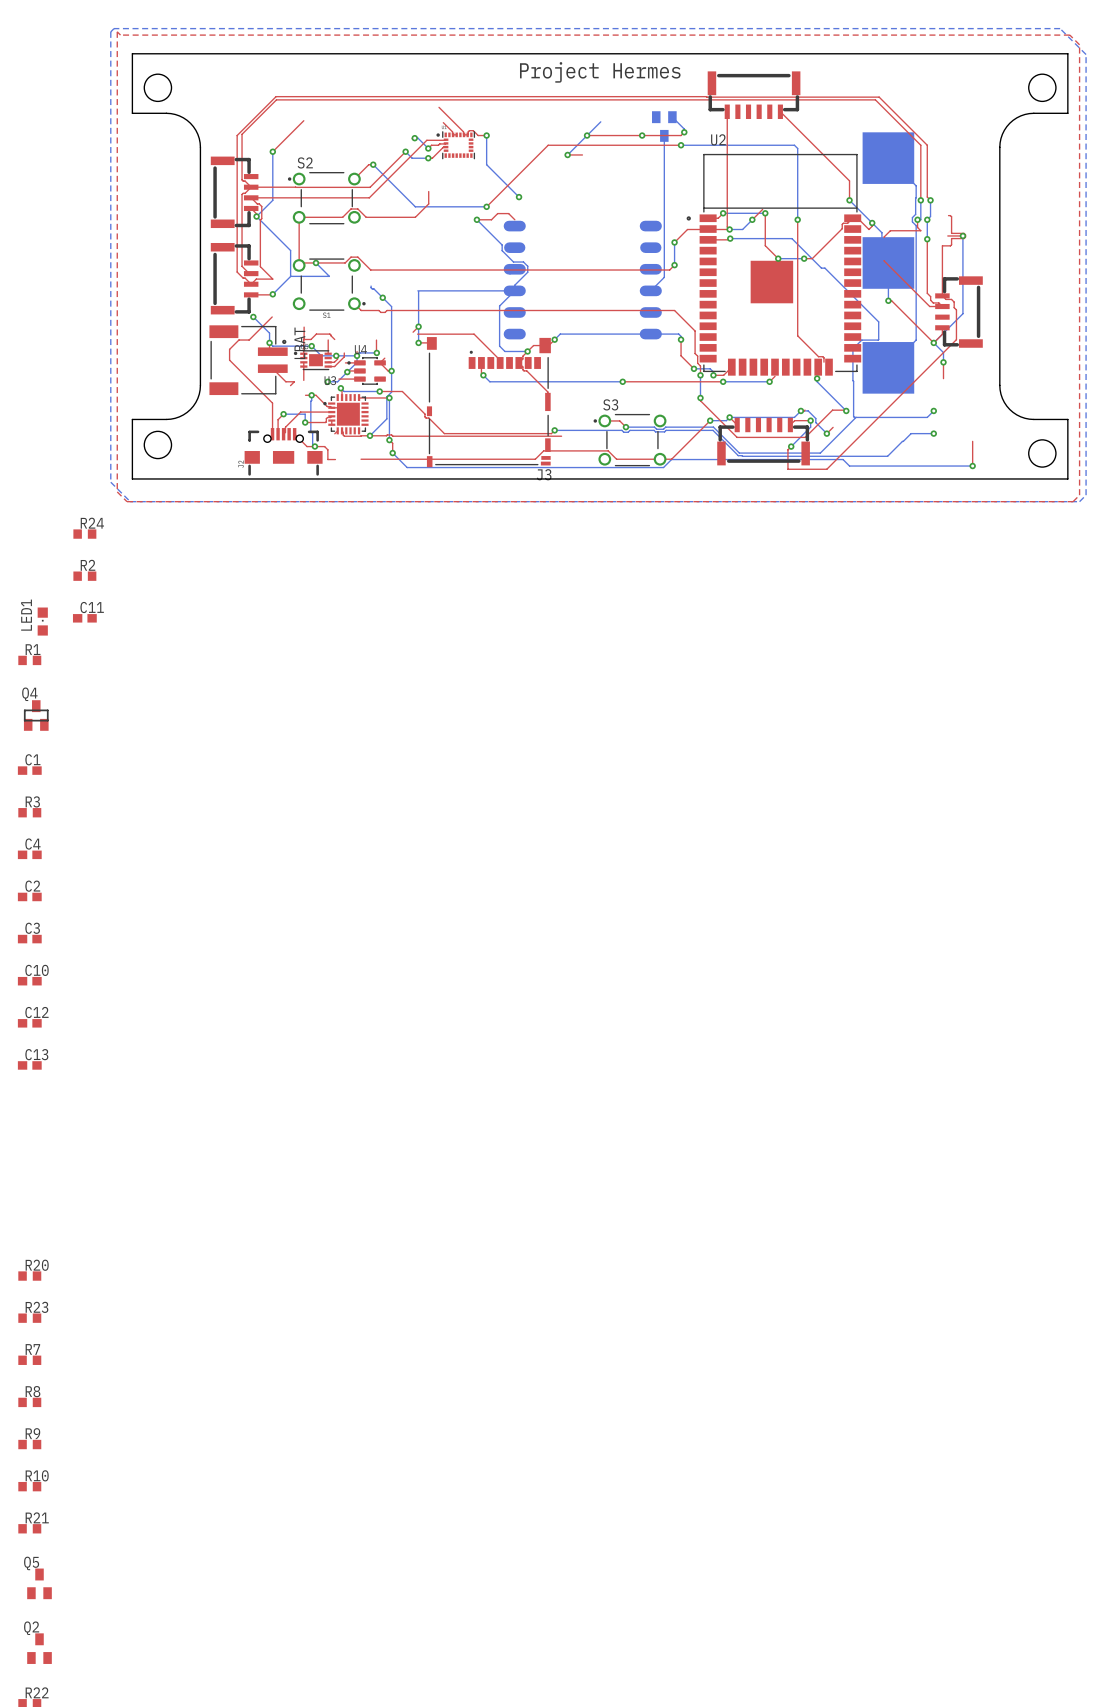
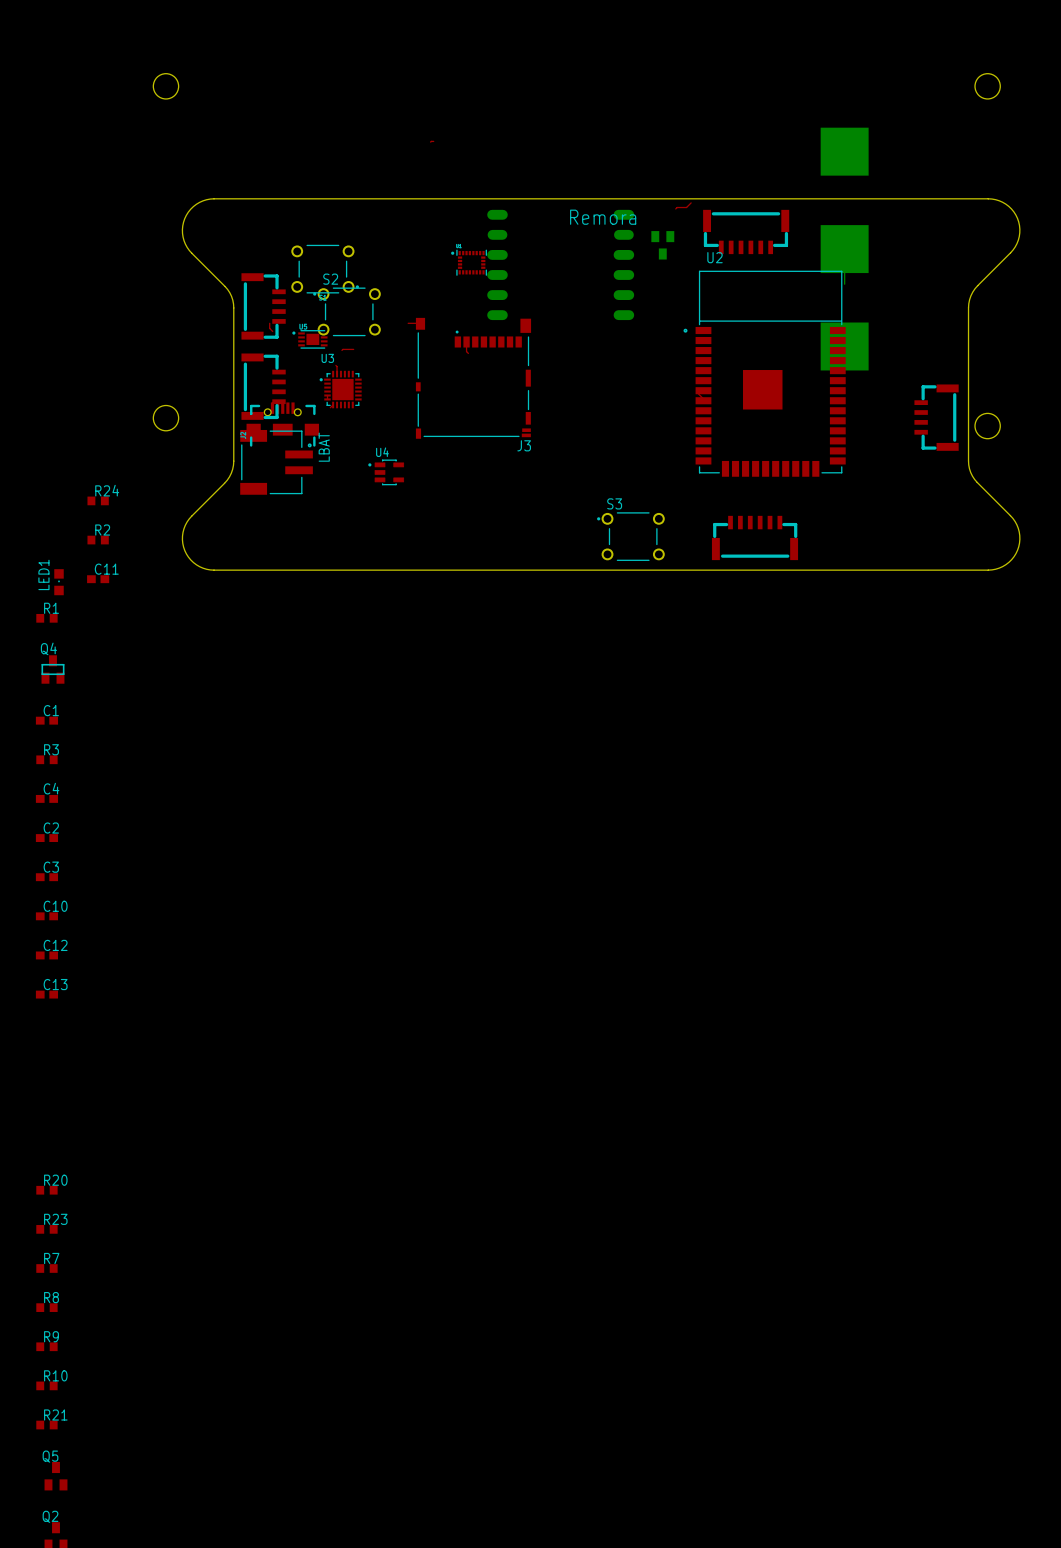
bottom zone outline: (114, 28) (1060, 28) (1086, 54) (1086, 495) (1079, 501) (130, 501) (110, 482) (110, 31) (114, 28) -> none
top zone outline: (117, 31) (117, 491) (126, 501) (1073, 501) (1079, 495) (1079, 44) (1069, 35) (120, 35) (117, 31) -> none
board edge: (132, 53) (132, 113) (170, 113) (183, 117) (195, 130) (200, 147) (199, 394) (190, 409) (179, 416) (166, 419) (132, 419) (132, 478) (1067, 478) (1067, 419) (1029, 419) (1016, 414) (1004, 402) (999, 385) (1000, 138) (1009, 123) (1020, 115) (1033, 113) (1067, 113) (1067, 53) (132, 53) -> none
text: Project Hermes (600, 72) -> none
part: (754, 95) -> none
top track: (439, 107) (463, 131) (464, 134) (467, 134) (469, 130) (473, 130) (478, 135) (486, 135) -> none
top track: (727, 111) (727, 227) (729, 229) (687, 229) (674, 242) -> none
top track: (780, 111) (849, 180) (849, 200) -> none
bottom track: (672, 117) (684, 129) (684, 132) -> none
top track: (303, 120) (272, 151) -> none
bottom track: (600, 121) (567, 154) -> none
top track: (443, 122) (453, 134) (456, 134) -> none
part position: (664, 126) -> (662, 245)
top track: (684, 132) (681, 135) (587, 135) -> none
via: (684, 132) -> none
bottom track: (486, 135) (486, 164) (519, 197) -> none
via: (486, 135) -> none
via: (587, 135) -> none
via: (642, 135) -> none
bottom track: (664, 135) (664, 277) (650, 290) -> none
bottom track: (414, 138) (417, 138) (428, 148) -> none
via: (414, 138) -> none
top track: (446, 139) (426, 140) (369, 197) (251, 197) (261, 206) (260, 266) (272, 279) (256, 279) (251, 284) (237, 272) (237, 135) (276, 96) (879, 97) (927, 145) (927, 197) (930, 200) -> none
top track: (446, 143) (431, 145) (428, 148) -> none
part position: (455, 145) -> (468, 262)
bottom track: (681, 145) (794, 145) (797, 148) (797, 219) -> none
top track: (681, 145) (548, 145) (486, 206) -> none
via: (681, 145) -> none
top track: (442, 147) (432, 158) (428, 158) -> none
via: (428, 148) -> none
bottom track: (272, 151) (272, 200) (256, 216) (290, 250) (290, 276) -> none
via: (272, 151) -> none
bottom track: (405, 151) (412, 158) (428, 158) -> none
top track: (405, 151) (370, 187) (251, 187) -> none
via: (405, 151) -> none
top track: (567, 154) (582, 154) -> none
via: (567, 154) -> none
via: (428, 158) -> none
bottom track: (888, 158) (916, 185) (915, 214) (912, 217) (912, 221) (916, 225) (916, 340) (888, 367) -> none
bottom track: (373, 164) (415, 206) (486, 206) -> none
top track: (373, 164) (368, 164) (354, 179) -> none
via: (373, 164) -> none
top track: (251, 187) (242, 194) (242, 266) (247, 271) (247, 275) (251, 273) -> none
top track: (251, 187) (242, 179) (242, 134) (276, 99) (875, 99) (920, 145) (920, 200) -> none
top track: (428, 191) (428, 203) (415, 217) (366, 217) (357, 209) (350, 209) (342, 217) (299, 217) (299, 265) (301, 262) (345, 262) (350, 257) (357, 257) (370, 270) (669, 270) (674, 265) -> none
part: (234, 192) -> none
via: (519, 197) -> none
S2 position: (324, 198) -> (346, 311)
bottom track: (849, 200) (881, 232) (881, 252) -> none
via: (849, 200) -> none
bottom track: (920, 200) (920, 219) (917, 219) -> none
via: (920, 200) -> none
bottom track: (930, 200) (930, 216) (927, 219) (927, 239) -> none
via: (930, 200) -> none
via: (486, 206) -> none
board edge: none -> (214, 198) (988, 198) (999, 200) (1008, 206) (1015, 214) (1019, 232) (1013, 249) (975, 288) (969, 299) (968, 461) (969, 468) (974, 479) (1015, 521) (1019, 535) (1017, 550) (1005, 564) (988, 570) (214, 570) (203, 568) (193, 562) (186, 553) (182, 536) (189, 518) (227, 480) (232, 469) (233, 304) (227, 289) (187, 247) (182, 229) (184, 218) (193, 206) (203, 200) (214, 198)
top track: (251, 208) (256, 216) -> none
top track: (762, 209) (752, 219) -> none
bottom track: (723, 213) (765, 213) -> none
via: (723, 213) -> none
top track: (765, 213) (765, 245) (778, 258) (778, 275) (771, 282) -> none
via: (765, 213) -> none
top track: (948, 215) (951, 216) (951, 233) (965, 234) (964, 238) (951, 238) (950, 245) (942, 245) (942, 295) (954, 302) (954, 307) (956, 309) (956, 339) (826, 469) (787, 469) (787, 449) (791, 446) -> none
via: (256, 216) -> none
bottom track: (476, 219) (502, 245) (502, 250) (513, 262) (523, 262) (527, 266) (527, 272) (514, 285) (514, 290) -> none
top track: (476, 219) (491, 219) (497, 213) (508, 213) (514, 219) -> none
via: (476, 219) -> none
bottom track: (752, 219) (742, 229) (729, 229) -> none
via: (752, 219) -> none
top track: (797, 219) (797, 335) (818, 356) (822, 356) (823, 362) -> none
via: (797, 219) -> none
top track: (917, 219) (917, 227) (920, 230) (890, 230) (884, 237) -> none
via: (917, 219) -> none
via: (927, 219) -> none
top track: (872, 223) (868, 229) (857, 218) (852, 218) (847, 223) (843, 223) (842, 228) (812, 258) (804, 258) -> none
via: (872, 223) -> none
text: none -> Remora (603, 217)
via: (729, 229) -> none
top track: (947, 235) (962, 235) -> none
bottom track: (962, 235) (962, 313) (933, 342) (943, 352) (943, 362) -> none
via: (962, 235) -> none
bottom track: (730, 238) (791, 238) (821, 268) (824, 268) (878, 321) (878, 339) (861, 340) (852, 348) (854, 417) (927, 417) (933, 410) -> none
top track: (730, 238) (708, 239) -> none
via: (730, 238) -> none
top track: (927, 239) (927, 293) (933, 302) (938, 302) (942, 306) (929, 306) (884, 260) -> none
via: (927, 239) -> none
bottom track: (674, 242) (674, 265) -> none
via: (674, 242) -> none
part: none -> (746, 231)
bottom track: (778, 258) (804, 258) -> none
via: (778, 258) -> none
via: (804, 258) -> none
bottom track: (316, 262) (329, 276) (290, 276) (272, 294) -> none
via: (316, 262) -> none
U2 position: (773, 264) -> (764, 373)
via: (674, 265) -> none
part position: (234, 278) -> (263, 306)
bottom track: (371, 286) (391, 306) (391, 392) (386, 396) (386, 418) (370, 435) -> none
bottom track: (417, 290) (514, 290) -> none
bottom track: (514, 290) (499, 306) (499, 346) (504, 351) (527, 351) -> none
bottom track: (418, 291) (418, 342) -> none
top track: (272, 294) (251, 294) -> none
via: (272, 294) -> none
via: (382, 297) -> none
top track: (888, 300) (891, 300) (933, 342) (942, 334) (942, 327) -> none
via: (888, 300) -> none
top track: (354, 303) (361, 310) (378, 310) (380, 312) (387, 310) (674, 310) (695, 331) (695, 353) (700, 366) (700, 375) -> none
part position: (958, 312) -> (936, 417)
bottom track: (253, 316) (269, 333) (269, 342) (272, 346) (311, 346) (321, 355) (357, 355) -> none
via: (253, 316) -> none
top track: (272, 316) (249, 340) (238, 340) (229, 349) (229, 360) (272, 403) (272, 434) -> none
top track: (418, 326) (413, 332) -> none
via: (418, 326) -> none
top track: (304, 327) (303, 339) -> none
top track: (417, 334) (474, 334) (500, 360) (500, 362) -> none
top track: (303, 339) (303, 358) -> none
top track: (303, 339) (310, 339) (316, 334) (329, 334) (334, 339) -> none
top track: (328, 339) (328, 353) -> none
bottom track: (554, 339) (560, 334) (678, 334) (681, 339) -> none
top track: (554, 339) (548, 345) (533, 345) (518, 362) (522, 369) (526, 370) (547, 392) (547, 401) -> none
via: (554, 339) -> none
top track: (681, 339) (681, 355) (694, 368) -> none
via: (681, 339) -> none
top track: (376, 340) (376, 352) -> none
via: (269, 342) -> none
via: (418, 342) -> none
via: (933, 342) -> none
via: (311, 346) -> none
top track: (357, 351) (357, 355) -> none
via: (527, 351) -> none
bottom track: (376, 352) (359, 352) (357, 355) -> none
via: (376, 352) -> none
top track: (344, 353) (344, 356) (334, 366) (328, 366) -> none
top track: (336, 355) (337, 359) (334, 362) (328, 362) -> none
via: (336, 355) -> none
bottom track: (357, 355) (357, 362) (337, 381) (327, 381) -> none
via: (357, 355) -> none
top track: (384, 358) (380, 362) (388, 370) (391, 370) -> none
LBAT position: (248, 360) -> (276, 462)
top track: (303, 362) (303, 380) -> none
top track: (345, 362) (359, 362) -> none
top track: (943, 362) (943, 378) -> none
via: (943, 362) -> none
top track: (731, 367) (723, 375) (713, 375) -> none
top track: (272, 368) (285, 381) (294, 381) (290, 385) -> none
bottom track: (694, 368) (710, 368) (713, 375) -> none
via: (694, 368) -> none
U4 position: (366, 370) -> (386, 472)
via: (391, 370) -> none
via: (347, 372) -> none
bottom track: (483, 375) (489, 381) (622, 381) -> none
via: (483, 375) -> none
bottom track: (700, 375) (700, 397) -> none
via: (700, 375) -> none
via: (713, 375) -> none
top track: (775, 376) (769, 381) -> none
bottom track: (817, 378) (817, 381) (846, 410) -> none
via: (817, 378) -> none
top track: (339, 379) (359, 379) -> none
via: (327, 381) -> none
top track: (622, 381) (723, 381) -> none
via: (622, 381) -> none
bottom track: (723, 381) (769, 381) -> none
via: (723, 381) -> none
via: (769, 381) -> none
bottom track: (340, 388) (344, 391) (379, 391) -> none
via: (340, 388) -> none
top track: (379, 391) (402, 391) (424, 414) (424, 416) (428, 418) (444, 433) (551, 433) (554, 430) -> none
via: (379, 391) -> none
top track: (305, 395) (316, 395) (327, 406) (343, 407) -> none
bottom track: (311, 395) (310, 431) (312, 433) (312, 444) (314, 446) -> none
via: (311, 395) -> none
top track: (359, 397) (389, 397) -> none
bottom track: (389, 397) (389, 440) -> none
via: (389, 397) -> none
top track: (700, 397) (700, 400) (737, 437) (805, 437) (832, 410) (846, 410) -> none
via: (700, 397) -> none
via: (800, 410) -> none
via: (846, 410) -> none
via: (933, 410) -> none
part: none -> (263, 386)
top track: (331, 412) (300, 412) (285, 427) (283, 434) -> none
bottom track: (283, 414) (305, 414) (305, 422) -> none
top track: (283, 414) (278, 419) (278, 434) -> none
via: (283, 414) -> none
top track: (331, 416) (327, 417) (325, 422) (305, 422) -> none
via: (729, 417) -> none
bottom track: (856, 417) (820, 453) (739, 453) (713, 427) (665, 427) (663, 429) (656, 429) (654, 427) (625, 427) -> none
top track: (604, 420) (619, 420) (625, 427) -> none
bottom track: (710, 420) (726, 420) (729, 417) (794, 417) (800, 410) (808, 410) (815, 418) (815, 422) (826, 433) -> none
top track: (710, 420) (671, 459) (616, 459) (608, 450) (543, 450) (535, 459) (361, 459) -> none
via: (710, 420) -> none
bottom track: (810, 420) (810, 427) (791, 446) -> none
top track: (810, 420) (794, 420) (790, 424) -> none
via: (810, 420) -> none
via: (305, 422) -> none
via: (625, 427) -> none
top track: (833, 427) (826, 433) -> none
bottom track: (554, 430) (621, 430) (623, 432) (630, 430) (713, 430) (738, 455) (742, 456) (887, 456) (911, 433) (933, 433) -> none
via: (554, 430) -> none
top track: (343, 432) (344, 436) (561, 436) -> none
via: (826, 433) -> none
via: (933, 433) -> none
top track: (294, 434) (307, 446) (324, 446) (327, 449) (327, 459) (335, 459) -> none
via: (370, 435) -> none
top track: (389, 440) (392, 443) (392, 453) -> none
via: (389, 440) -> none
S3 position: (630, 440) -> (630, 536)
part: (763, 441) -> none
top track: (972, 441) (972, 466) -> none
via: (314, 446) -> none
via: (791, 446) -> none
bottom track: (392, 453) (407, 467) (663, 467) (671, 459) (843, 459) (849, 466) (972, 466) -> none
via: (392, 453) -> none
via: (972, 466) -> none
part: none -> (755, 537)

